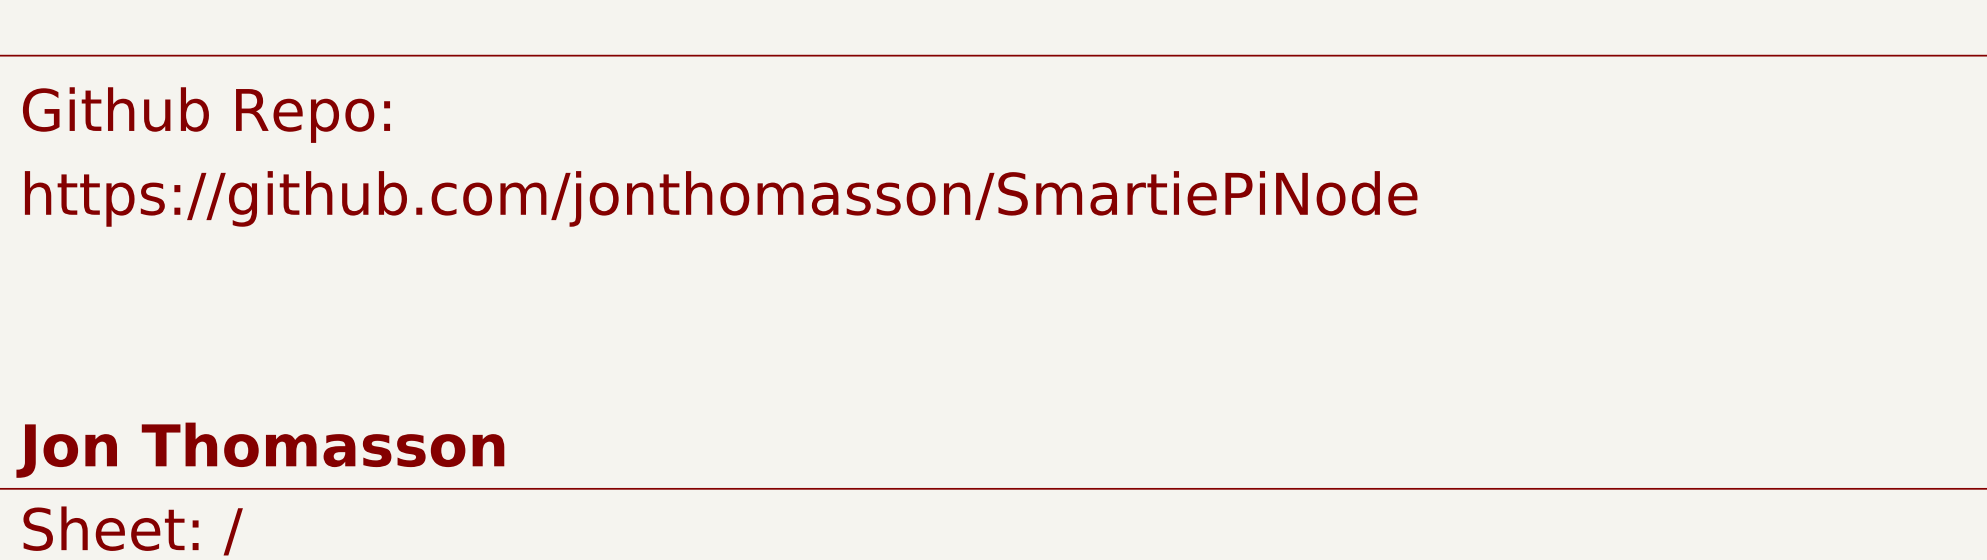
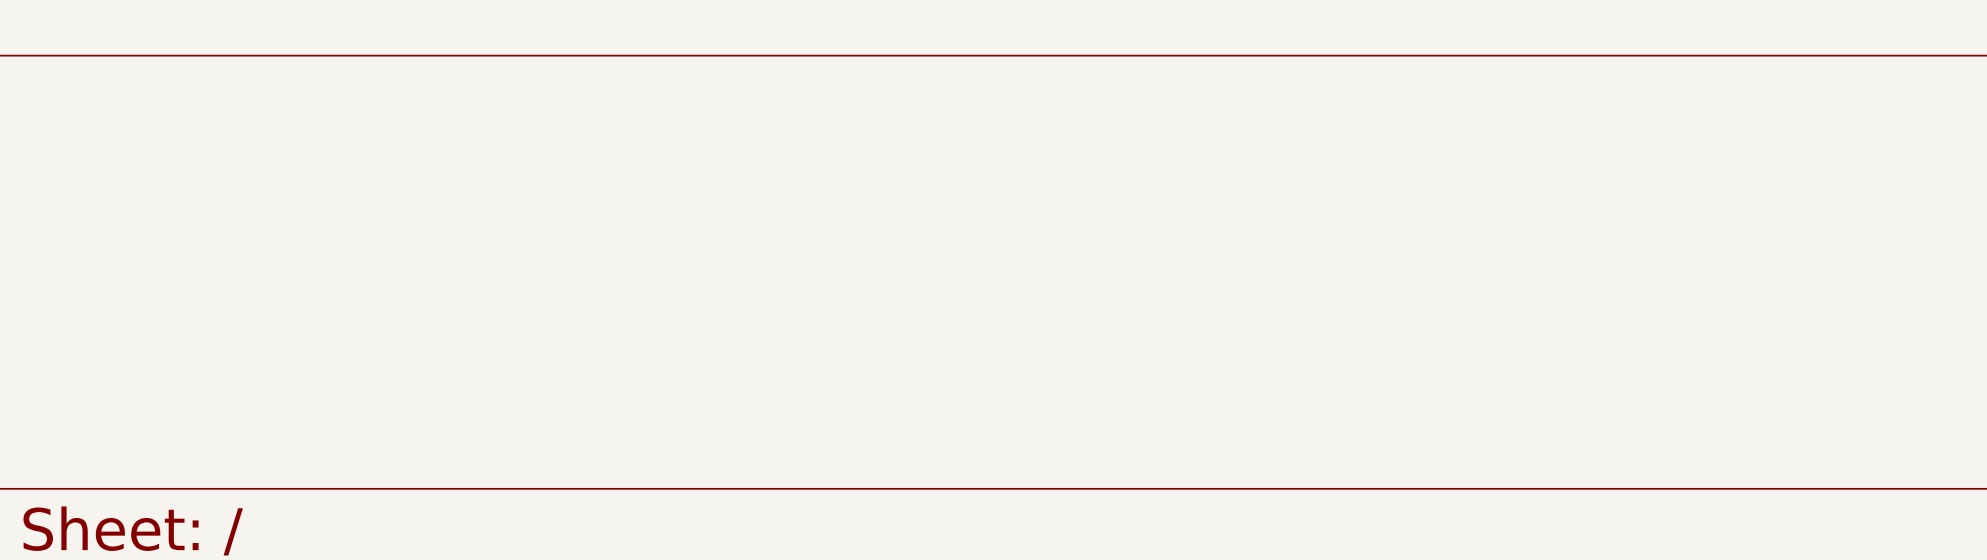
title block: Github Repo: (206, 115) -> none
title block: https://github.com/jonthomasson/SmartiePiNode (721, 198) -> none
title block: Jon Thomasson (260, 450) -> none

